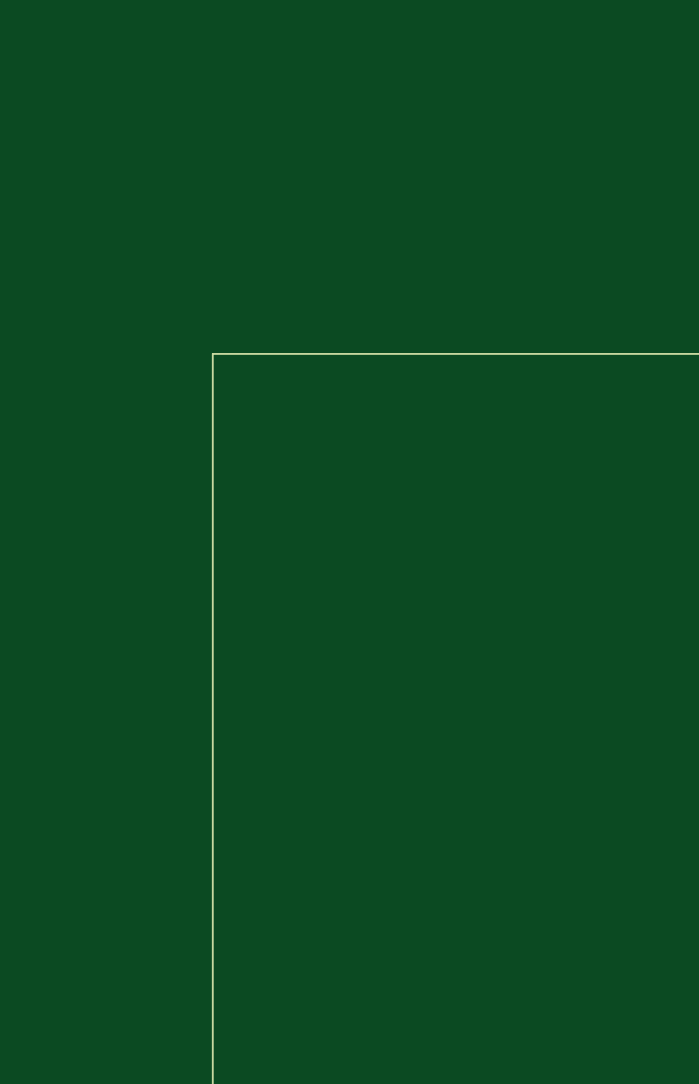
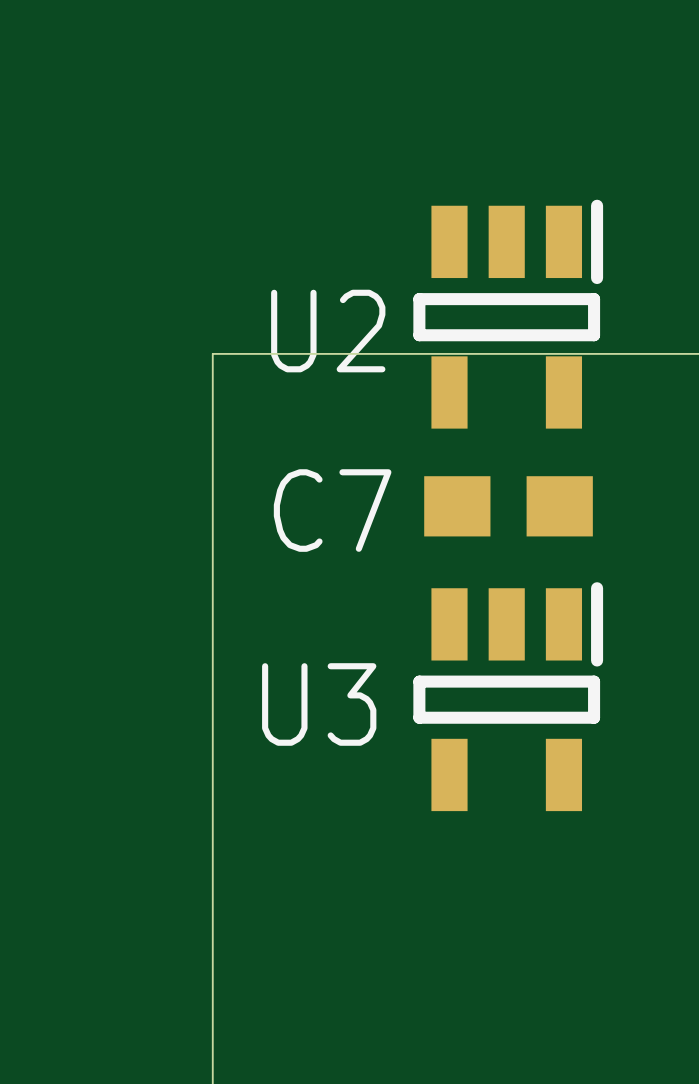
U2: none -> (508, 314)
C7: none -> (508, 506)
U3: none -> (508, 696)

